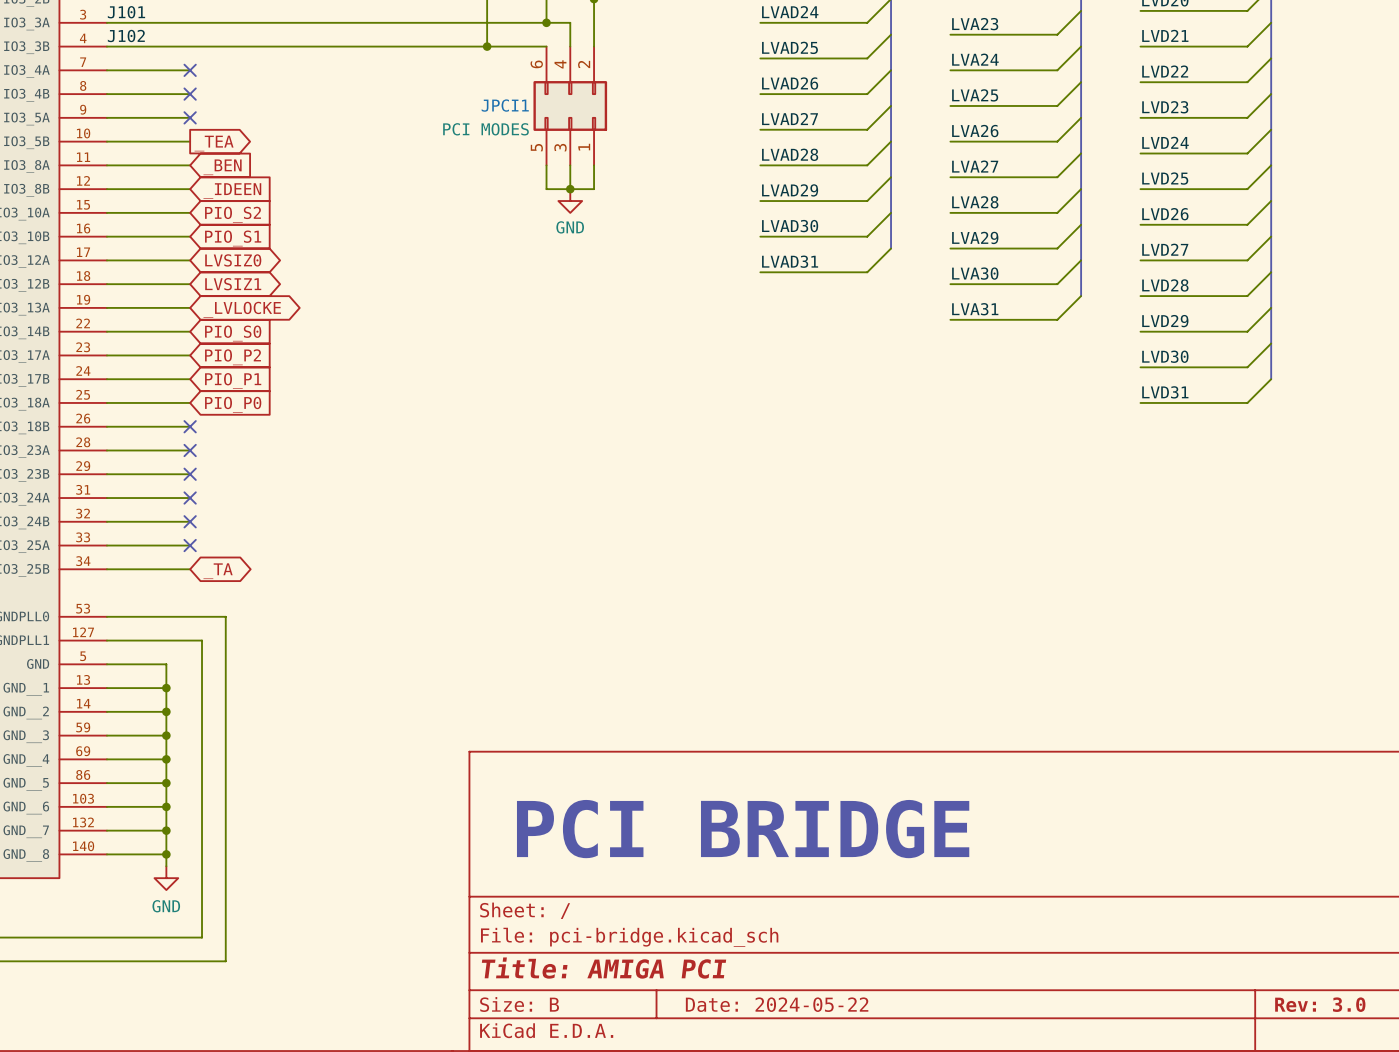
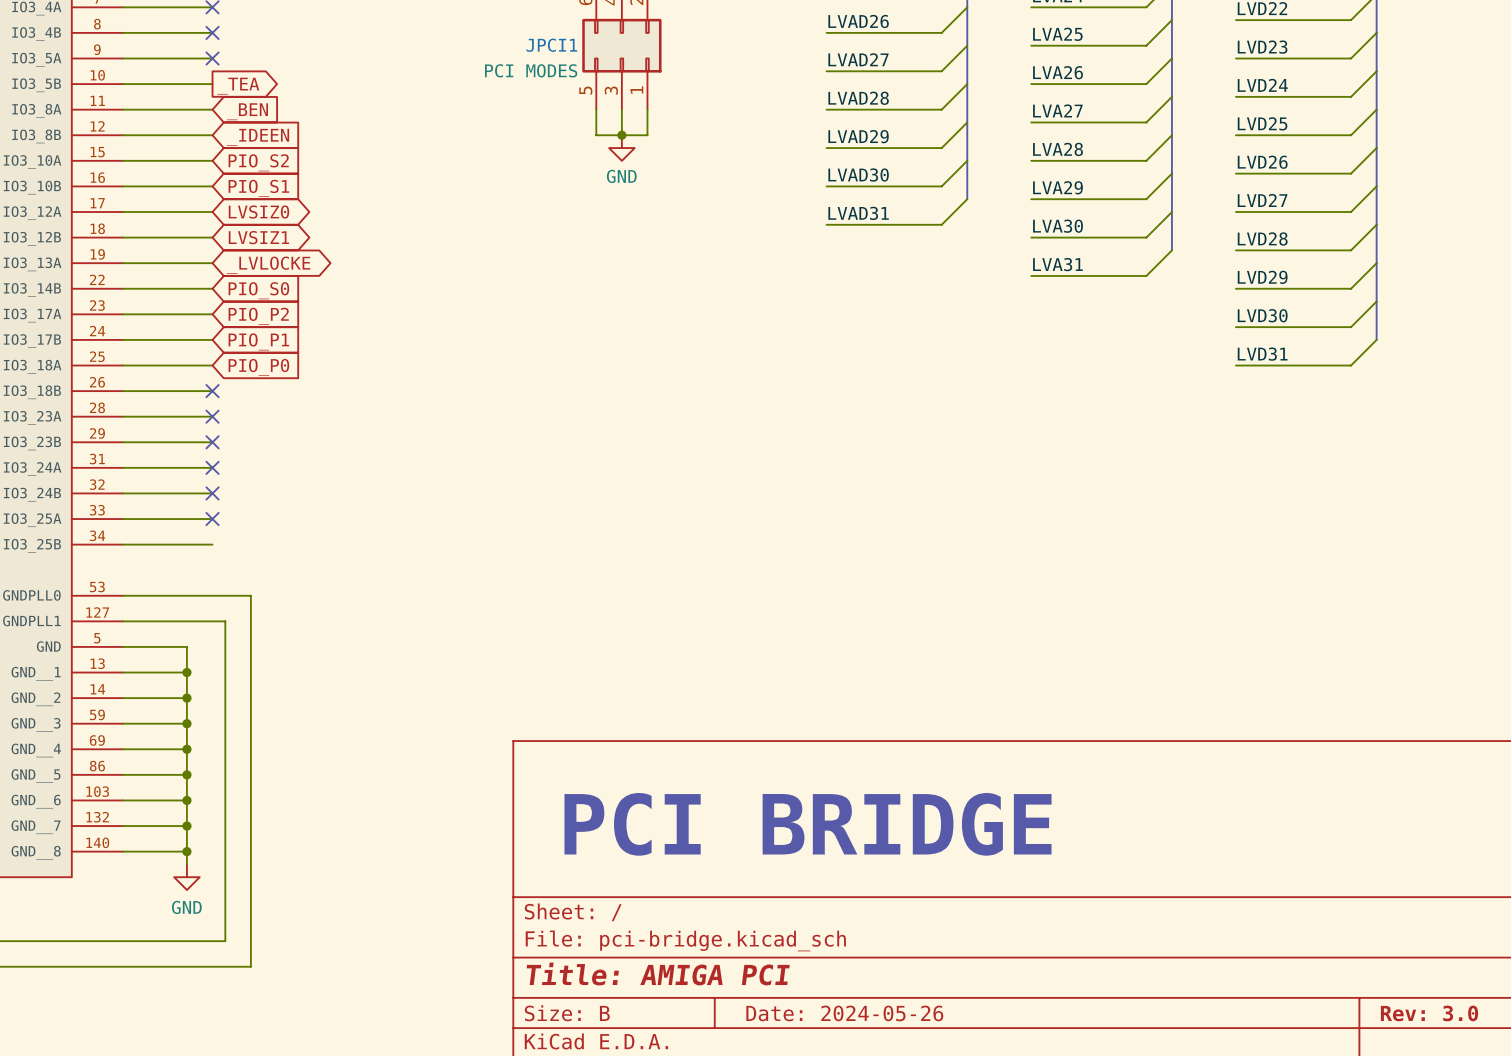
global label: _TA (218, 571) -> none
title block: Date: 2024-05-22 (777, 1004) -> Date: 2024-05-26 (844, 1013)

